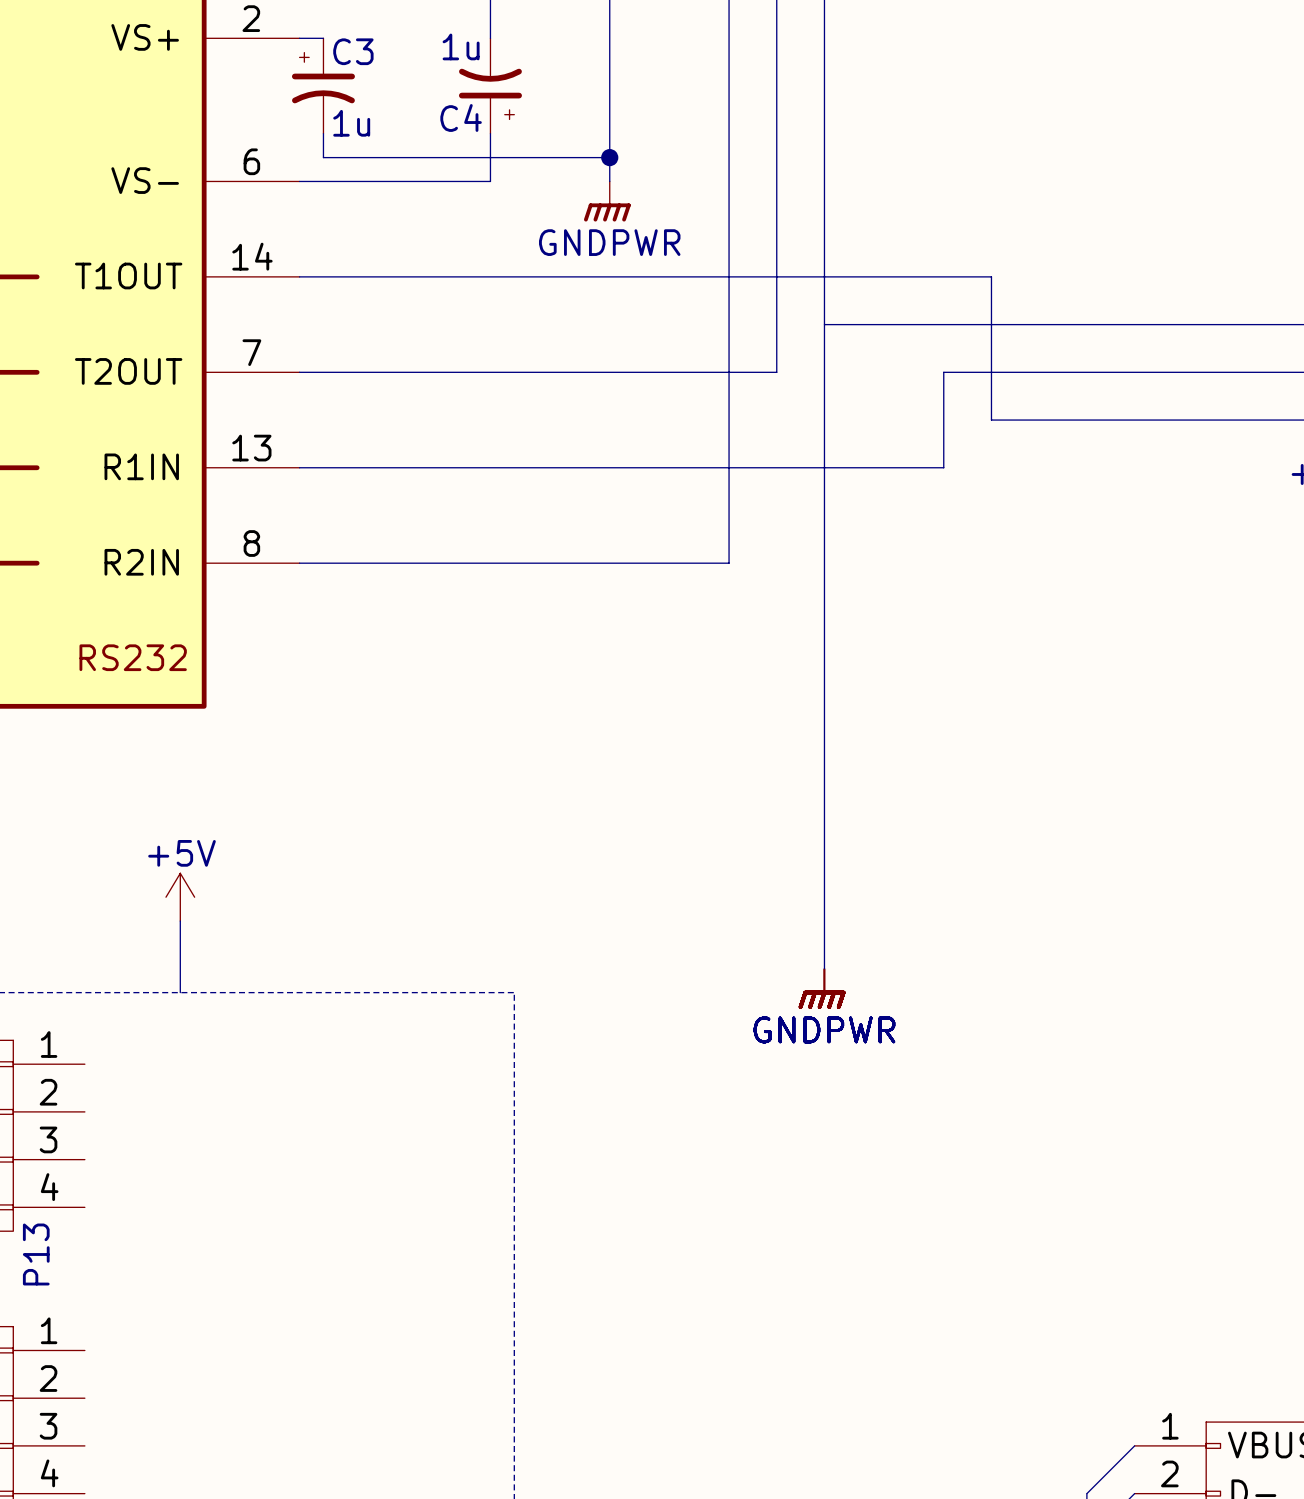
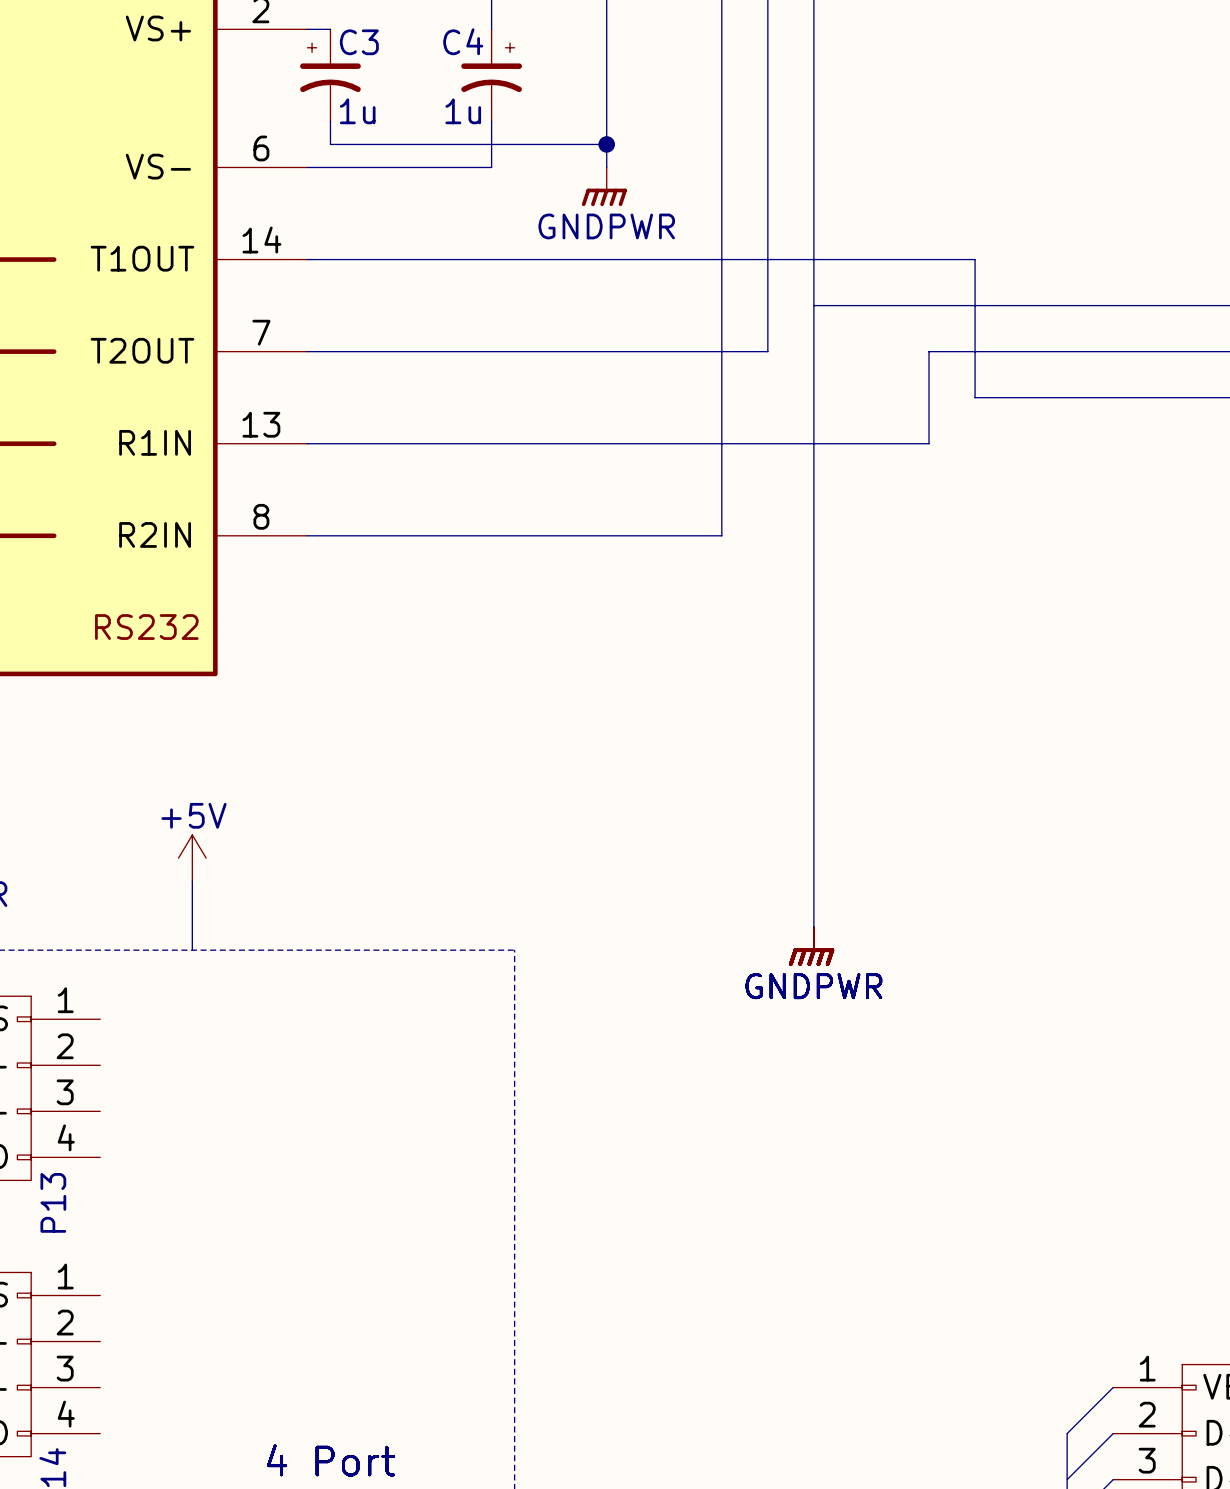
C4 flip: as is (490, 94) -> up-down (491, 67)

